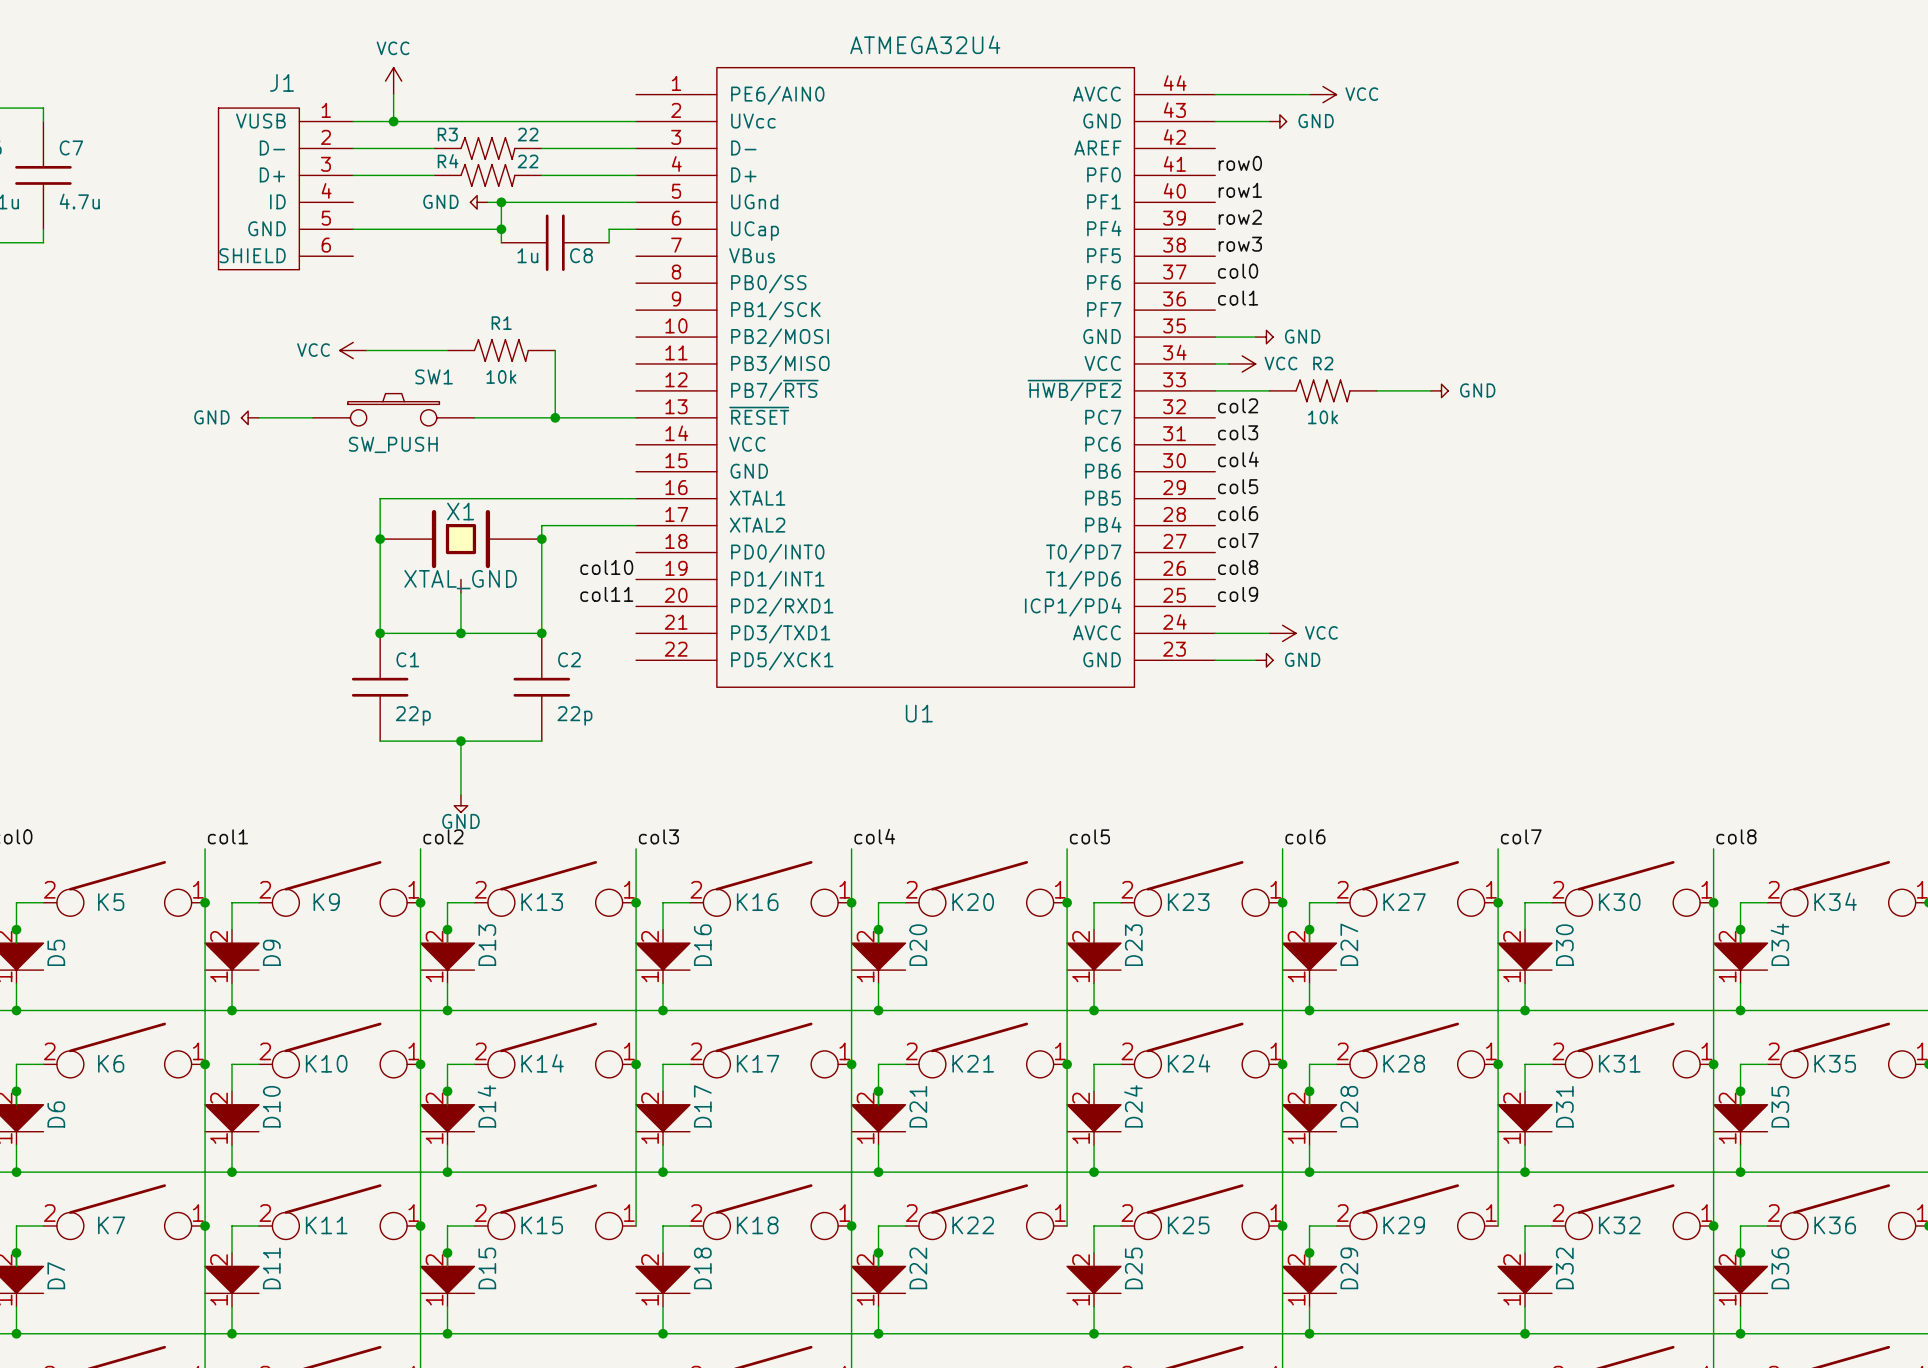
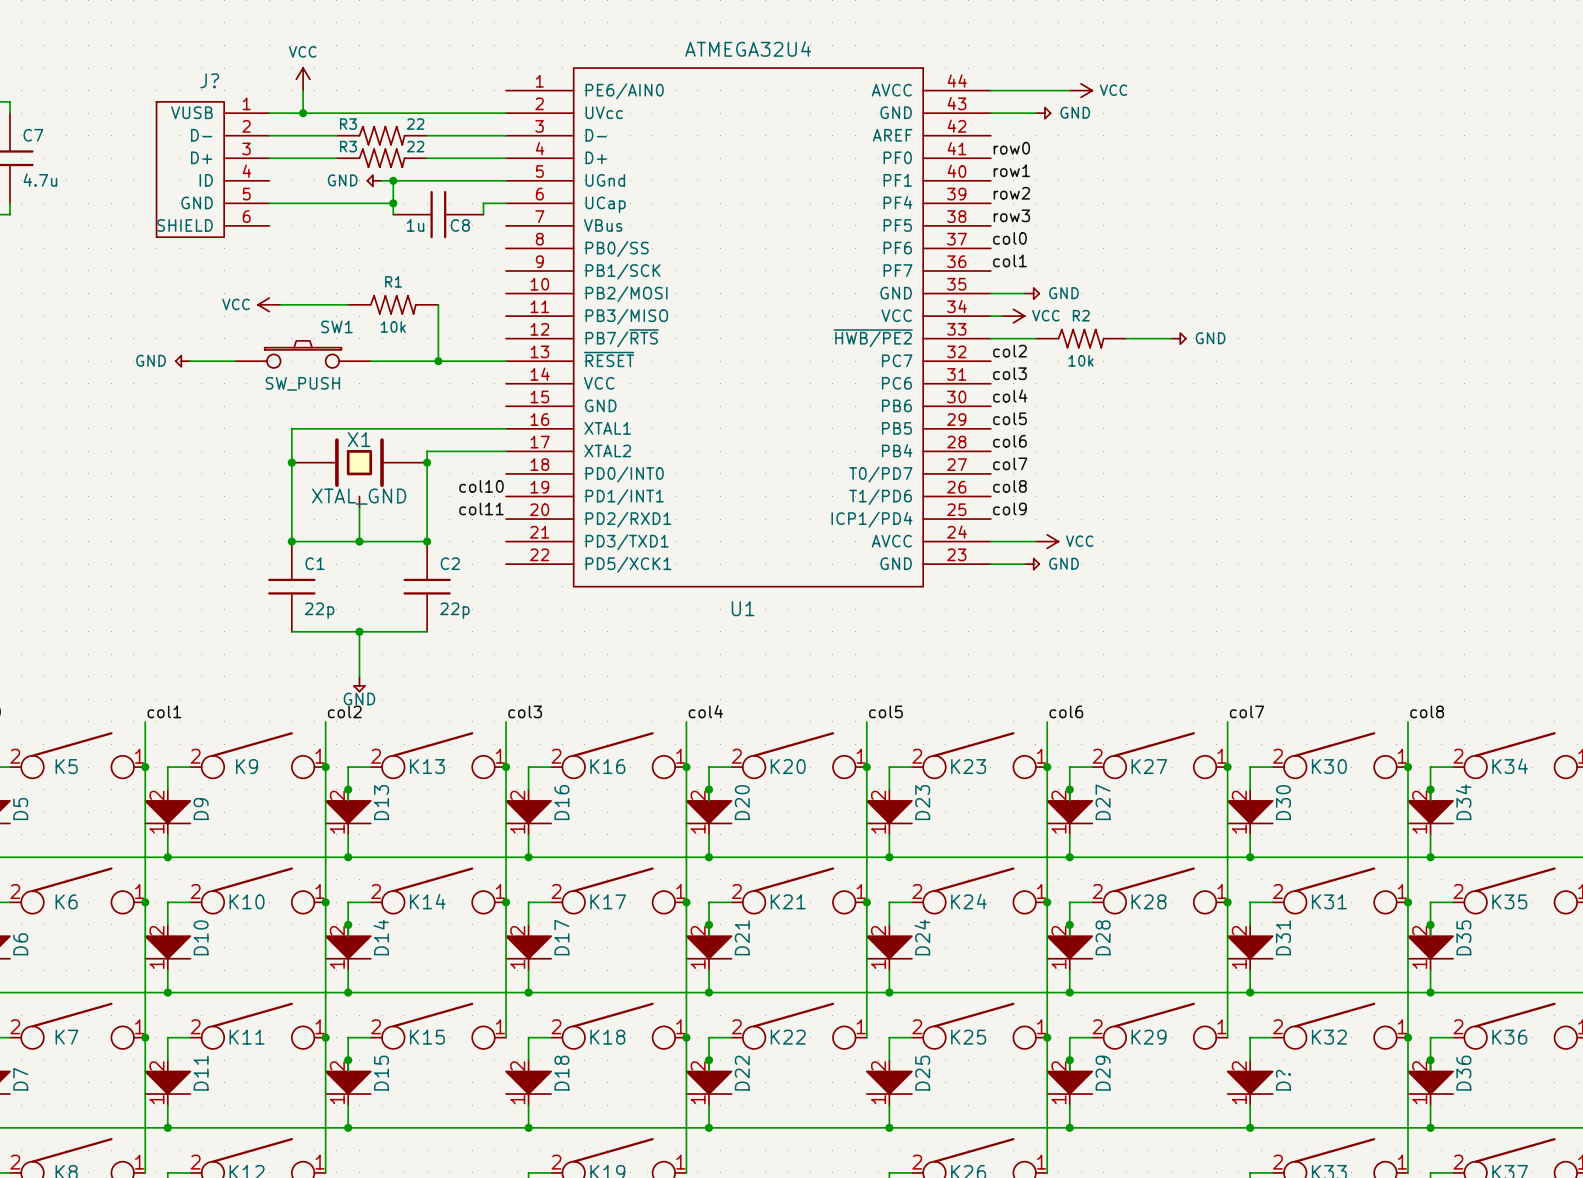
J1 name: J1 (281, 82) -> J? (209, 80)
R4 name: R4 (448, 161) -> R3 (348, 146)
D32 name: D32 (1564, 1268) -> D? (1283, 1080)

